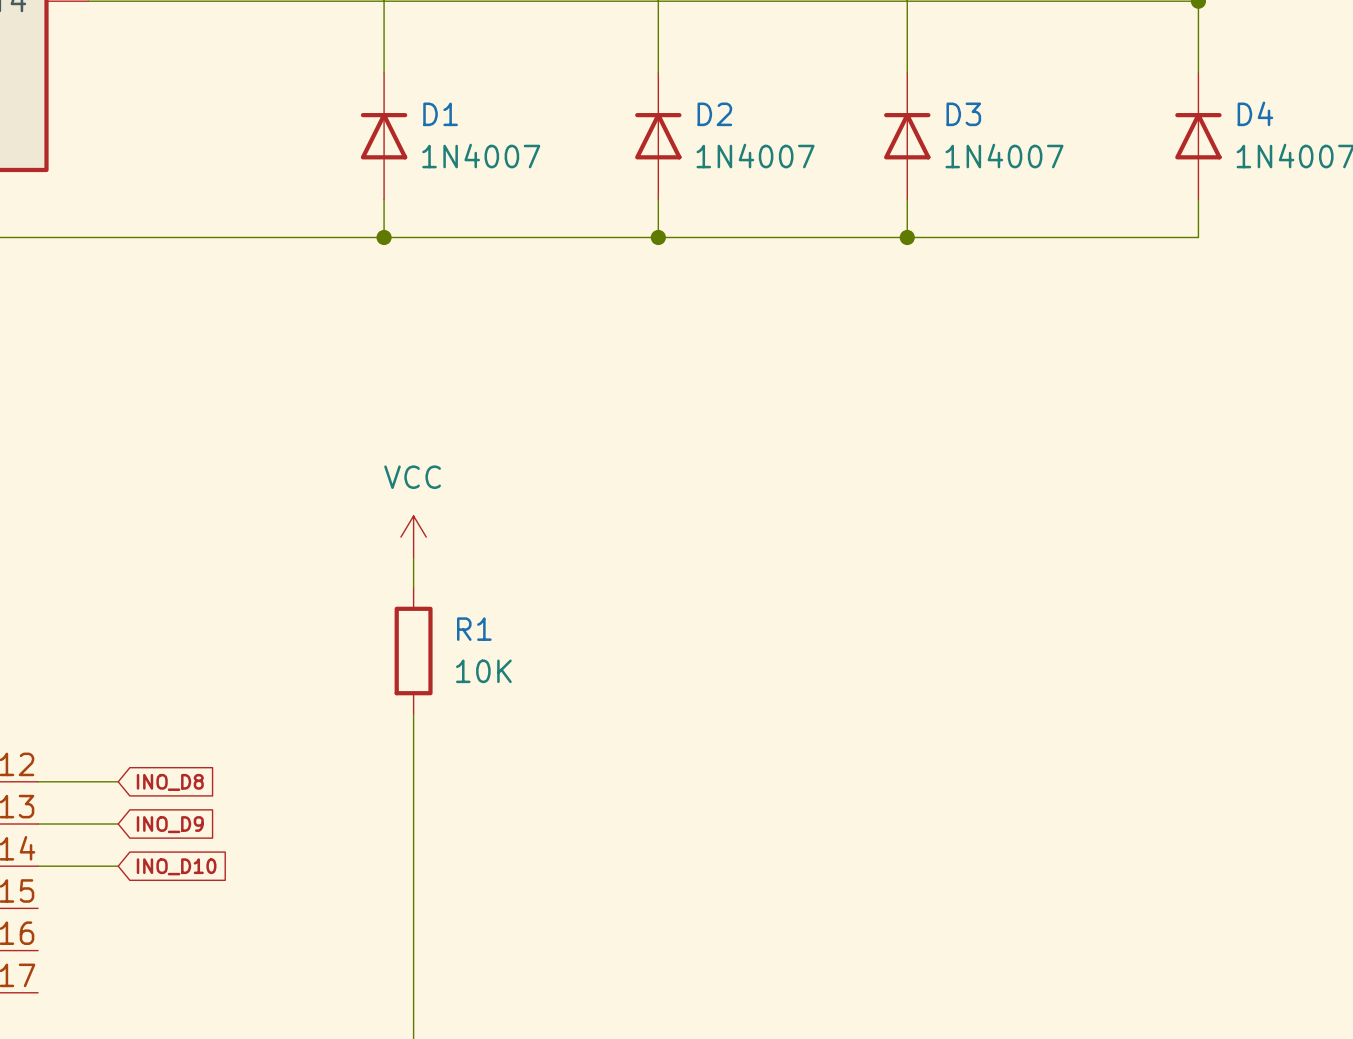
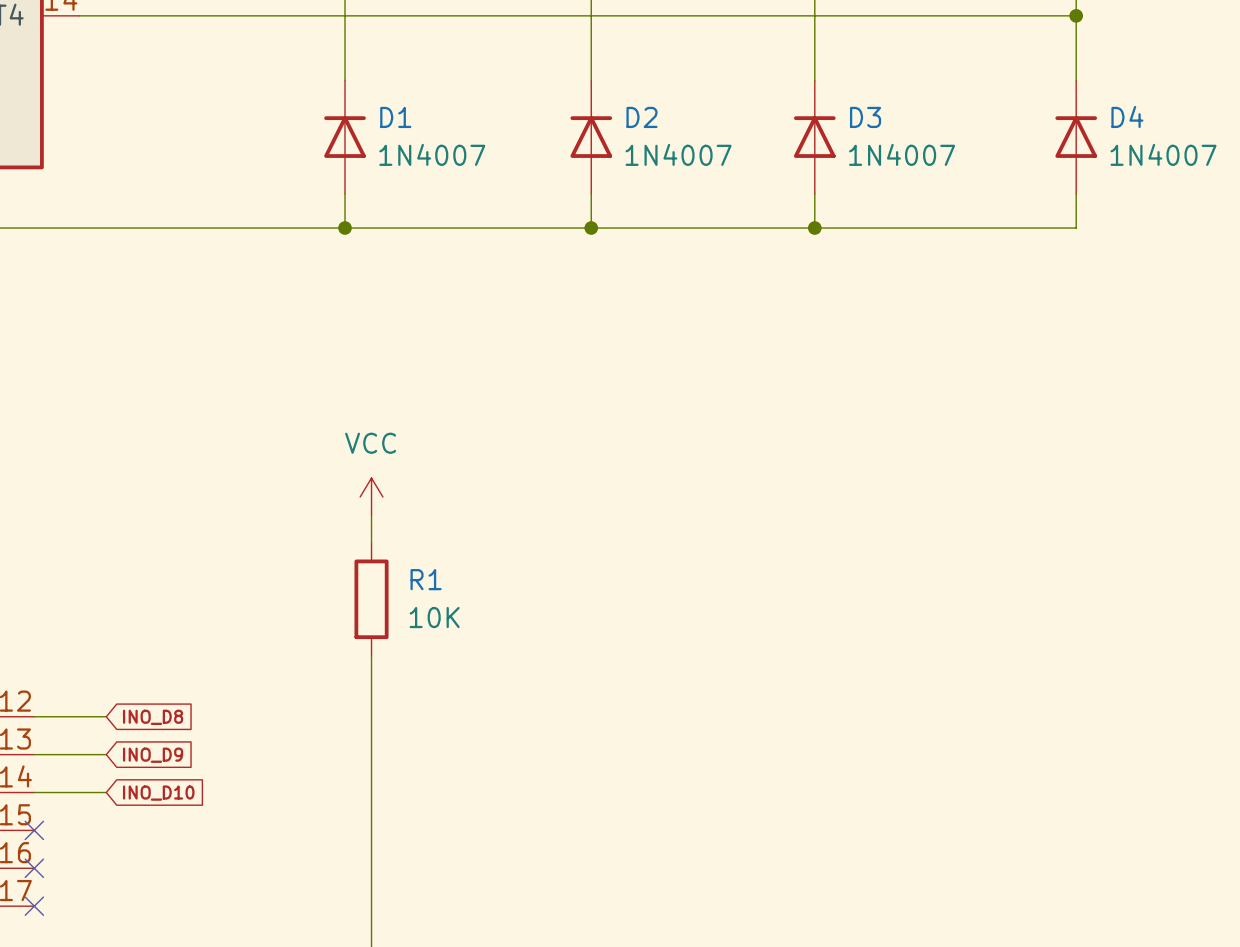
no-connect mark: none -> (34, 830)
no-connect mark: none -> (34, 868)
no-connect mark: none -> (34, 906)

